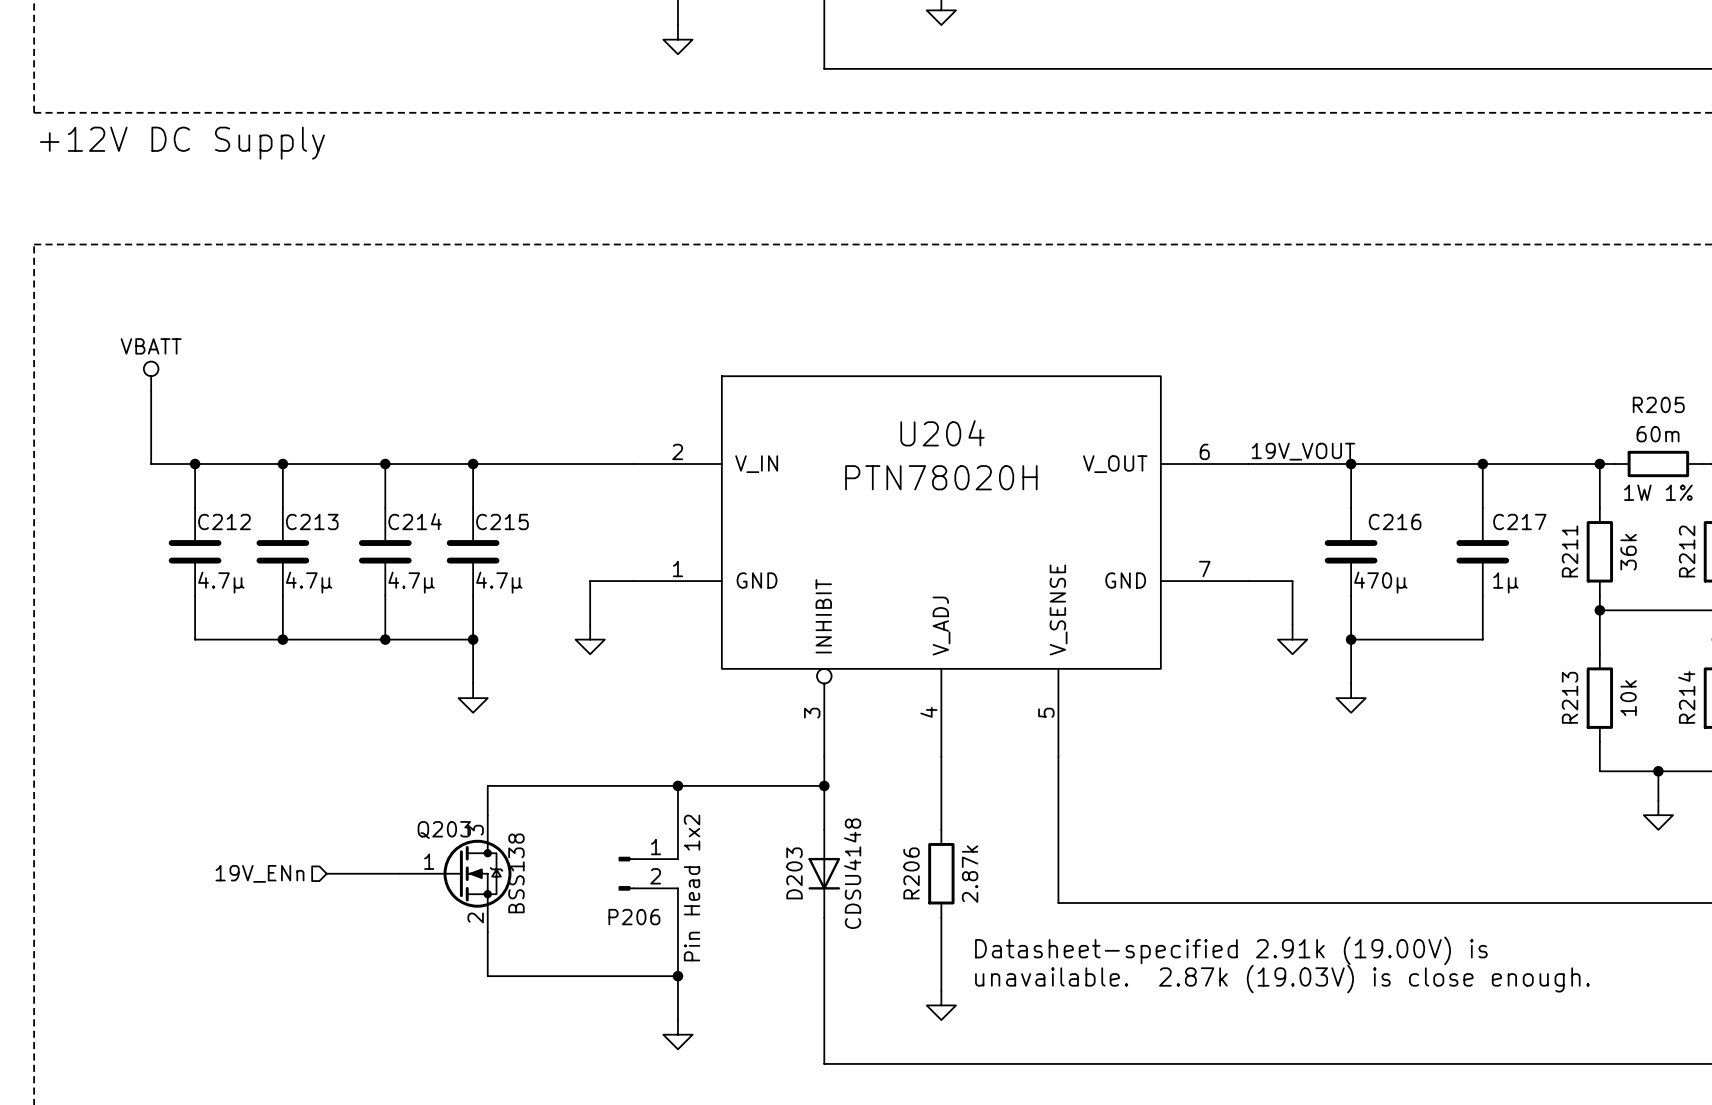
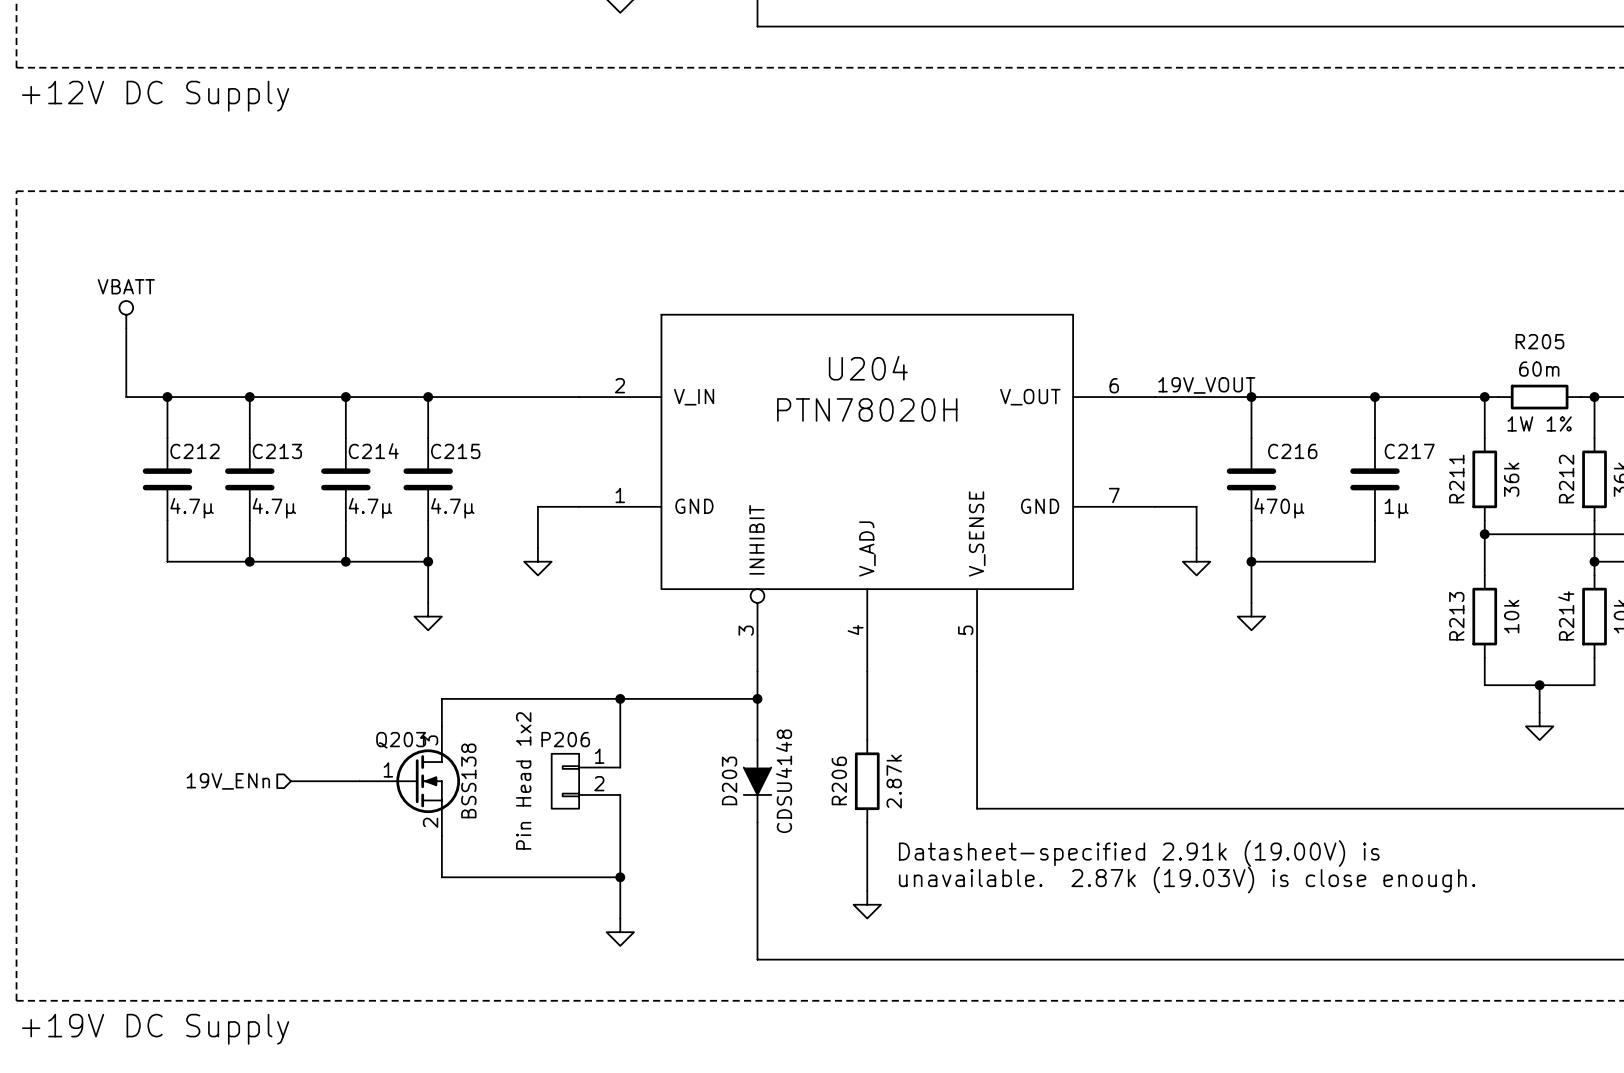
Q203 symbol: [399, 815, 512, 933] -> [359, 726, 461, 837]
D203 symbol: [808, 829, 841, 918] -> [742, 740, 773, 823]
P206 symbol: [618, 856, 678, 891] -> [551, 753, 621, 809]
P206 value position: Pin Head 1x2 (692, 888) -> Pin Head 1x2 (523, 780)
P206 name position: P206 (634, 917) -> P206 (565, 739)

